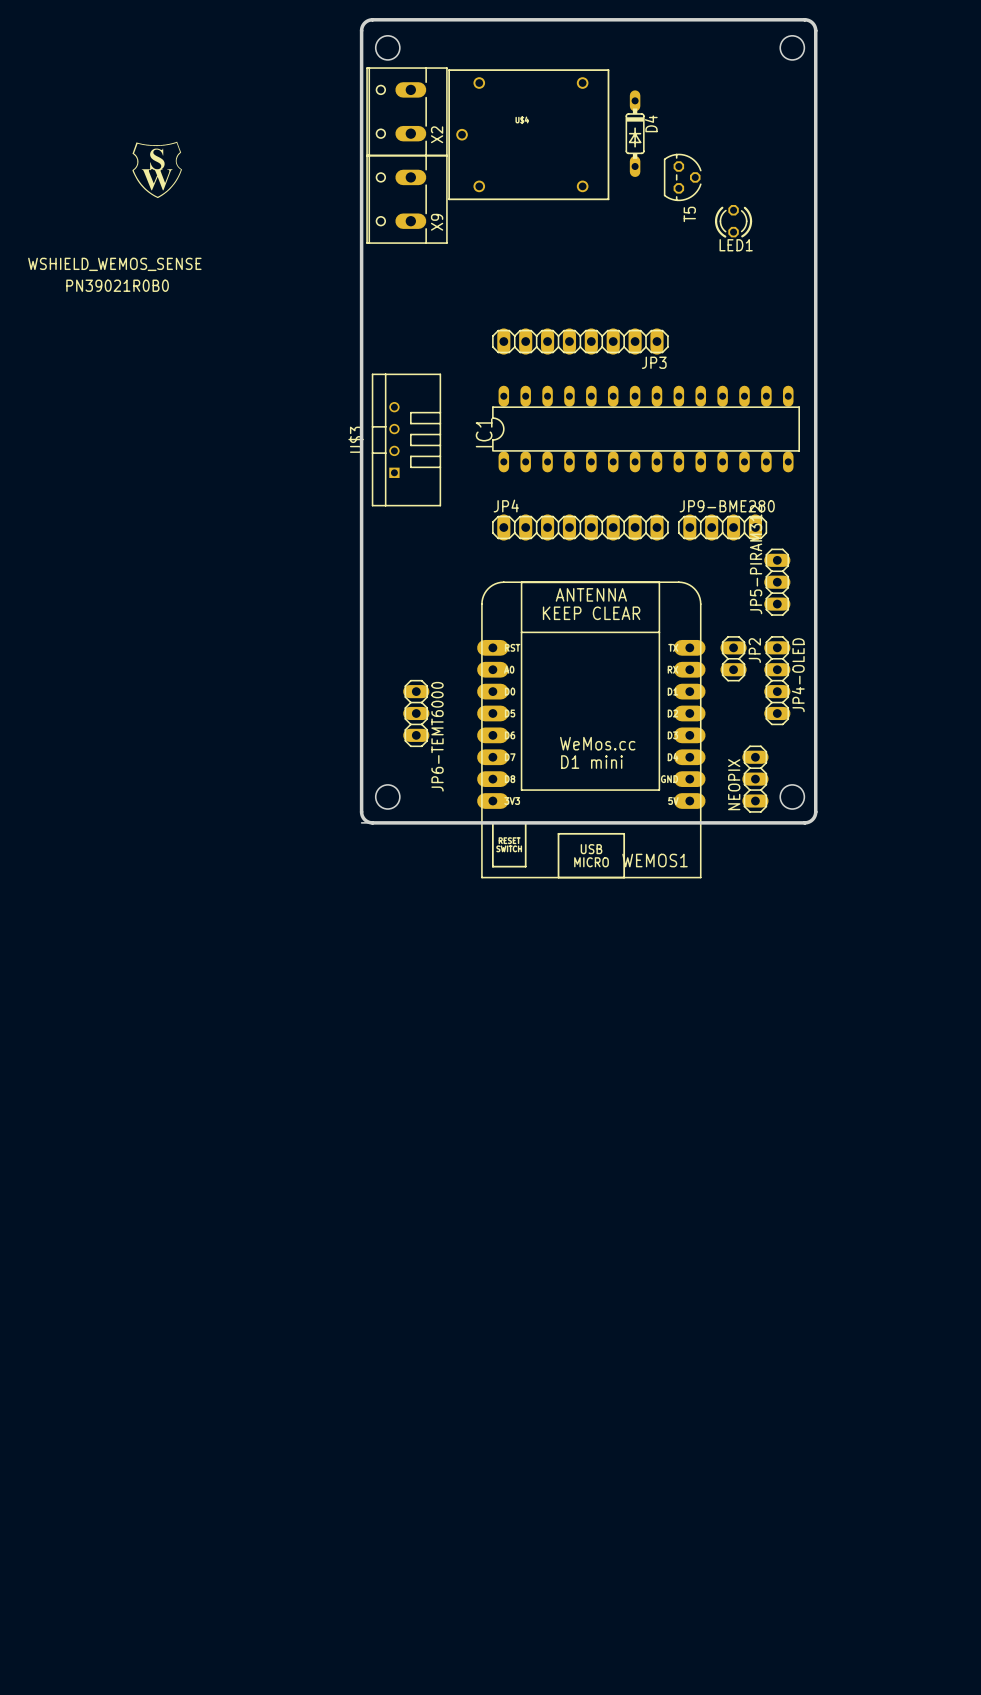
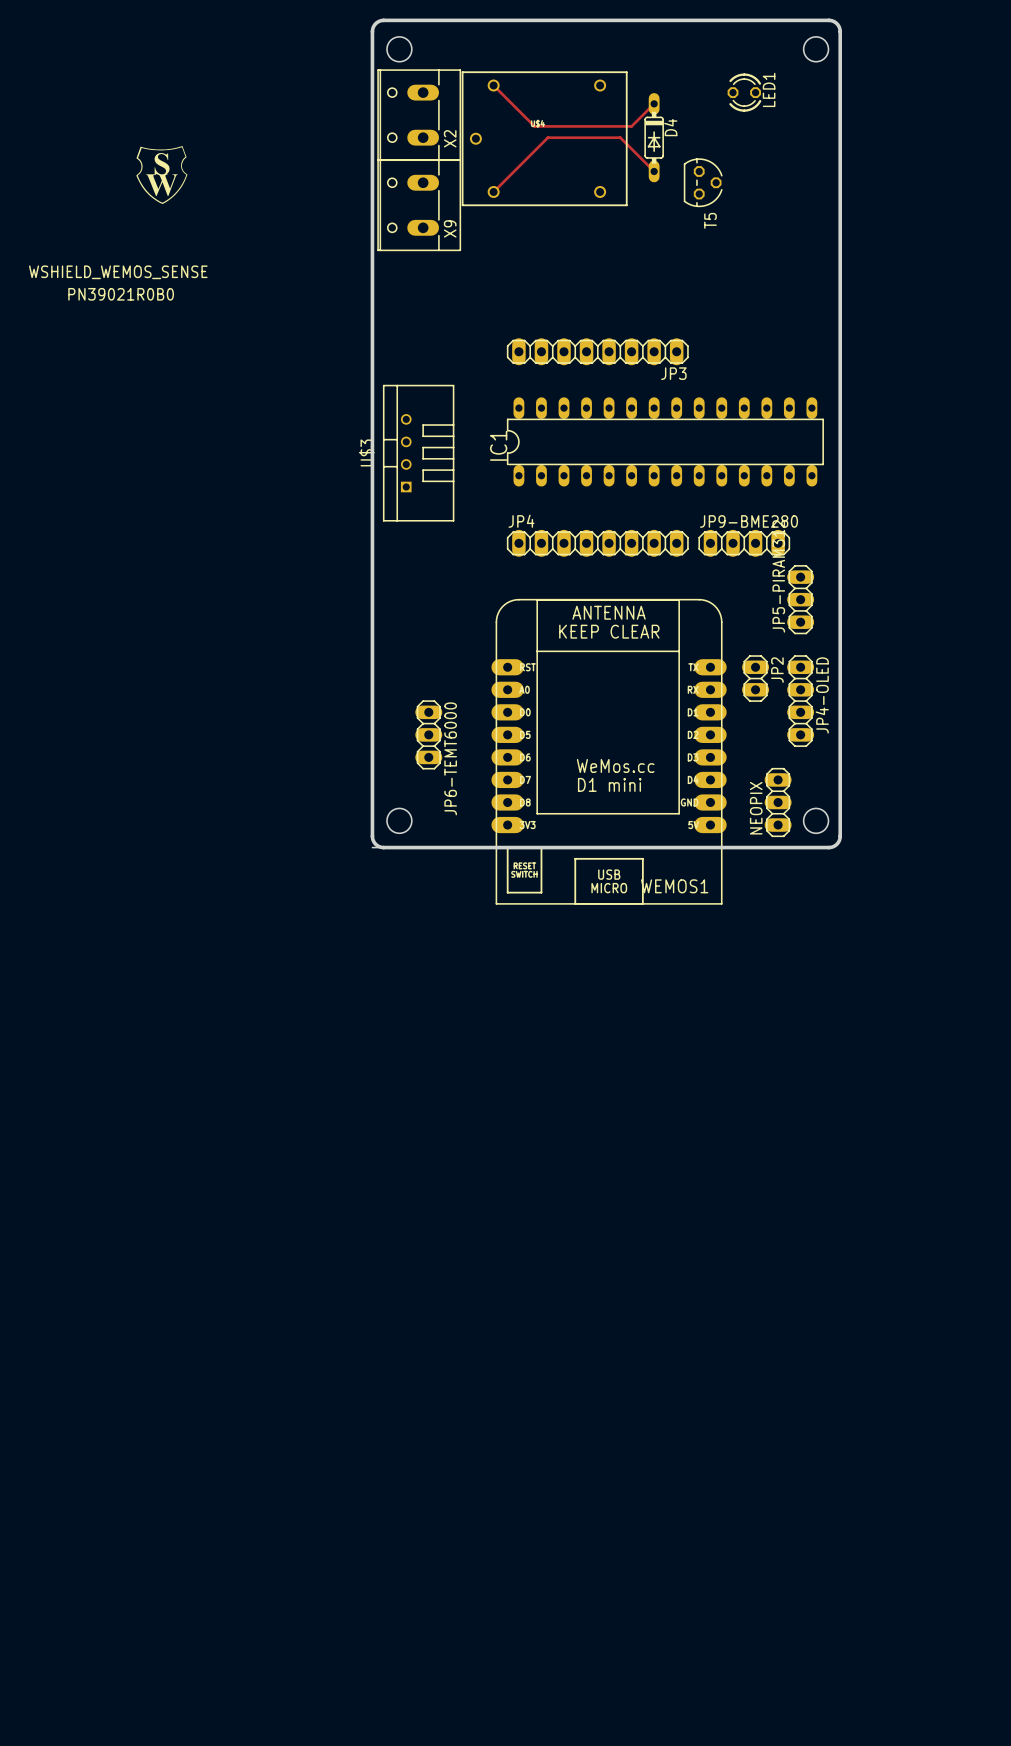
track: none -> (493, 85) (534, 126) (631, 126) (654, 103)
track: none -> (654, 171) (620, 137) (547, 137) (493, 191)
LED1 rotation: 0° (733, 221) -> 90° counterclockwise (744, 92)
LED1 position: (733, 221) -> (744, 92)

